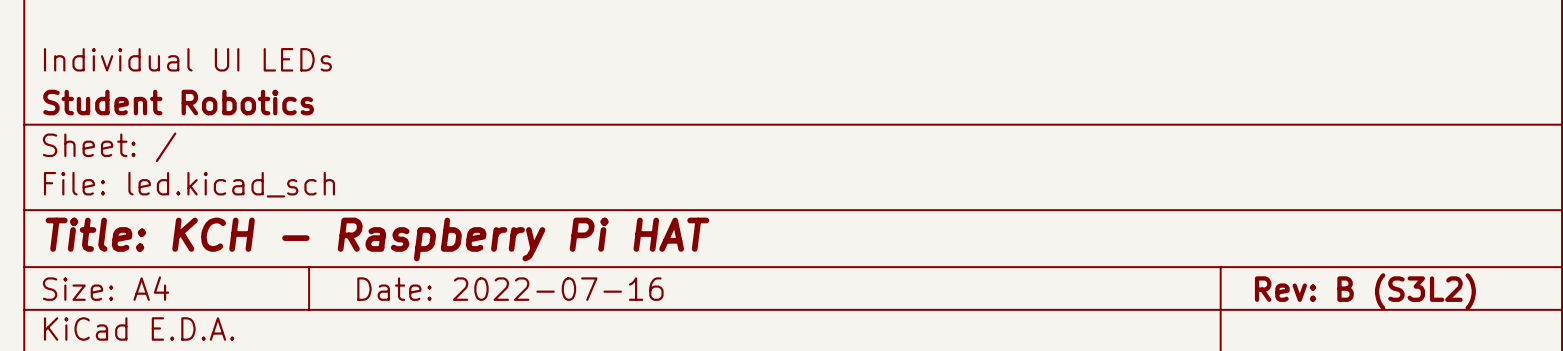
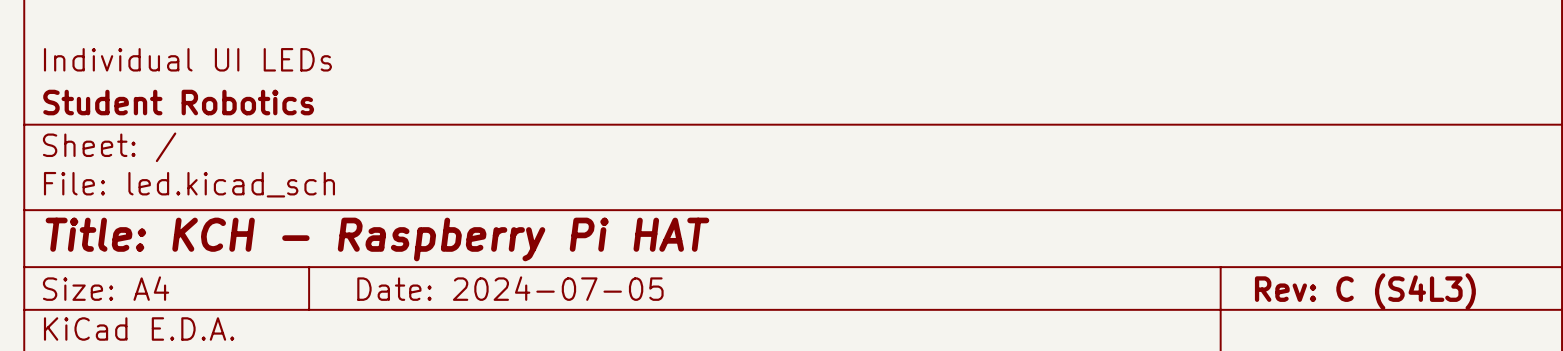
title block: Date: 2022-07-16 (510, 289) -> Date: 2024-07-05 (510, 288)
title block: Rev: B (S3L2) (1365, 291) -> Rev: C (S4L3) (1365, 291)

